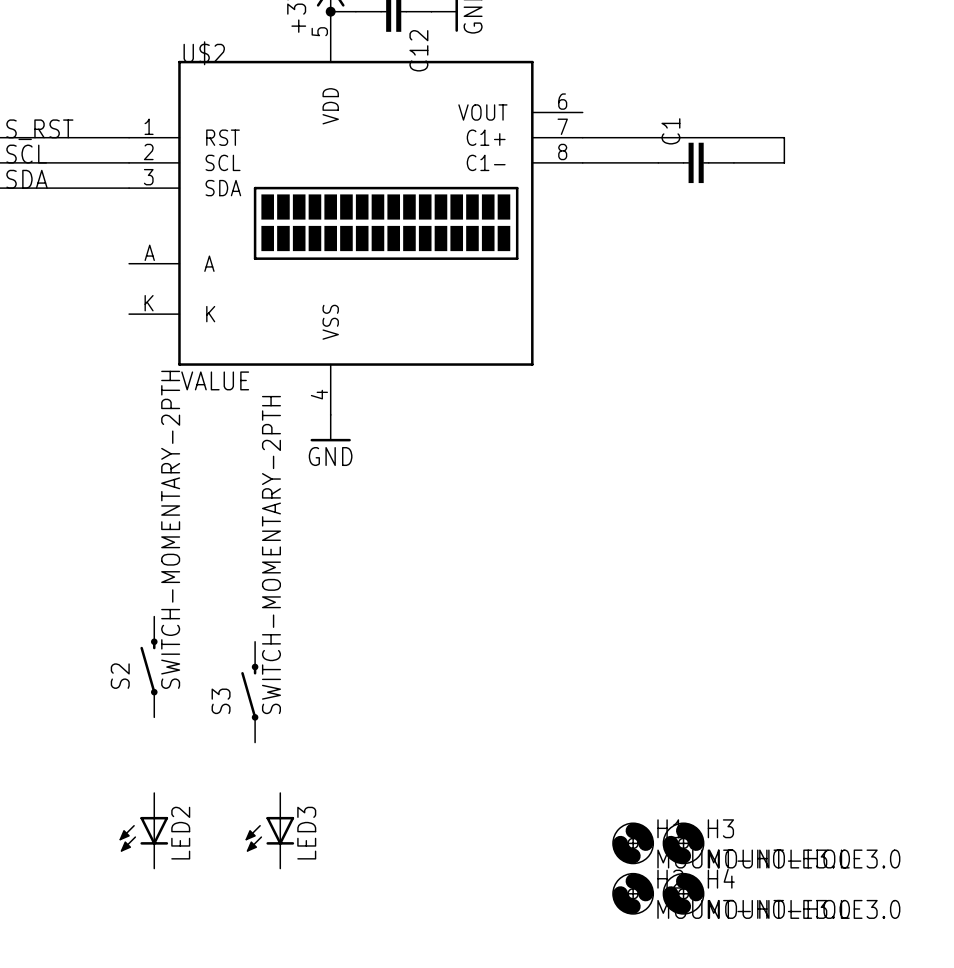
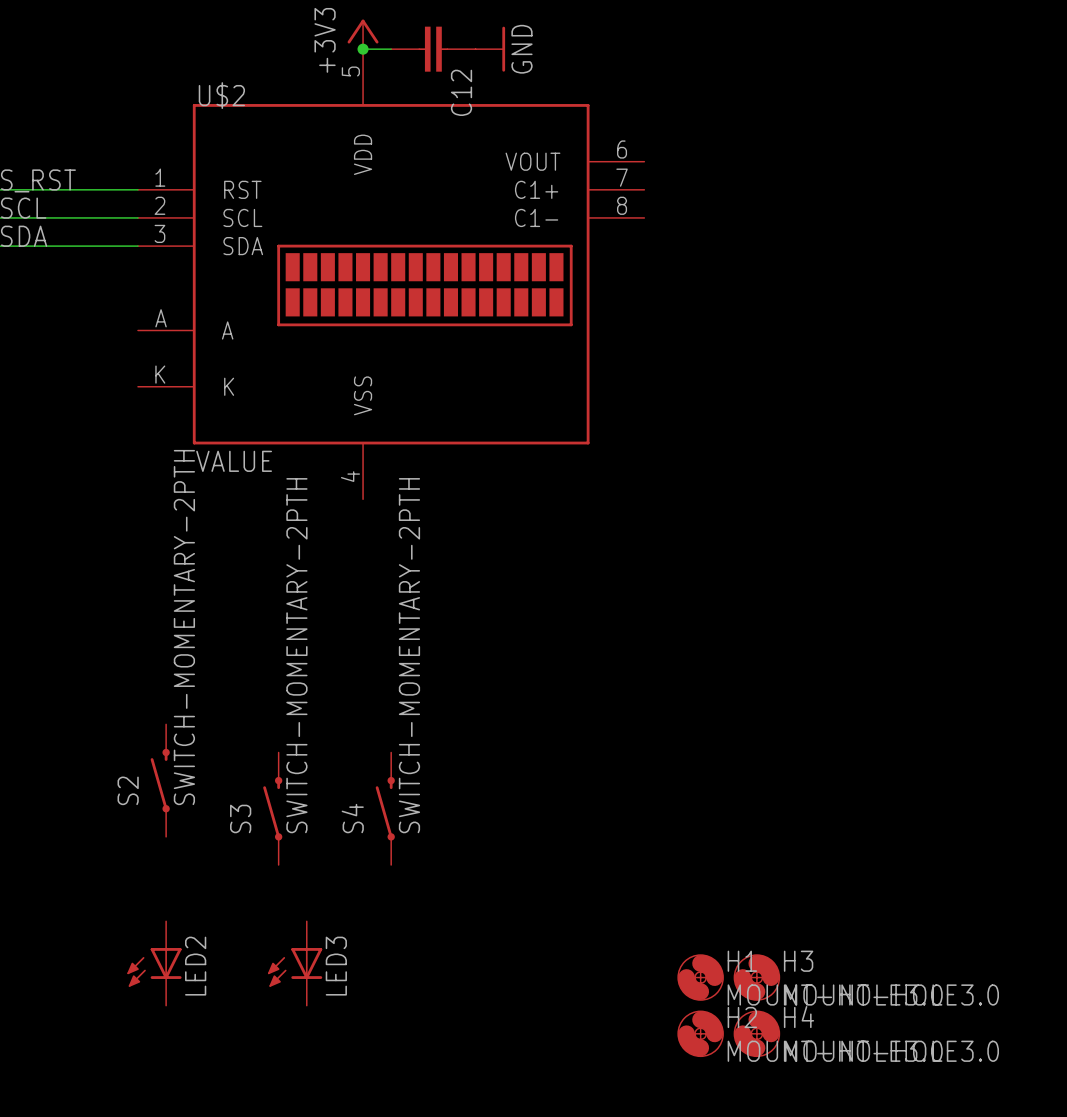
wire: (582, 137) (784, 137) (784, 162) (733, 162) -> none
wire: (582, 162) (658, 162) -> none
C1: (696, 162) -> none
power symbol: GND (330, 428) -> none
S4: none -> SWITCH-MOMENTARY-2PTH (385, 808)

